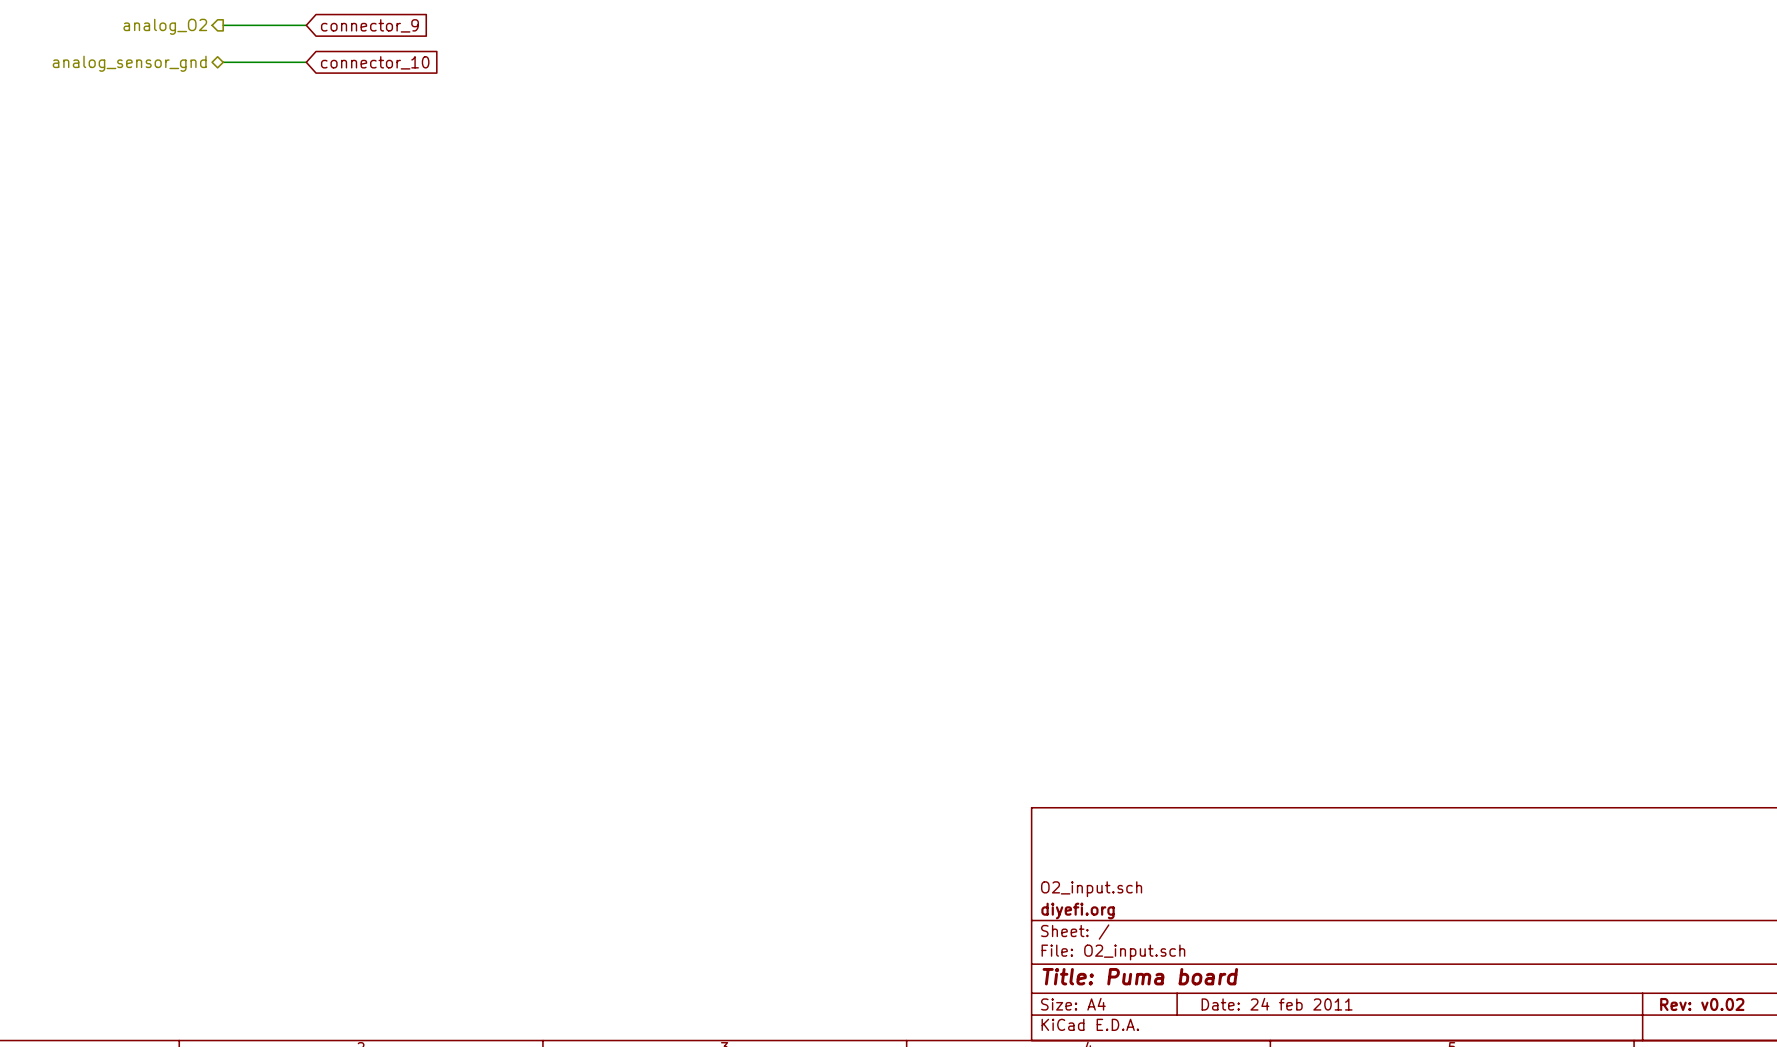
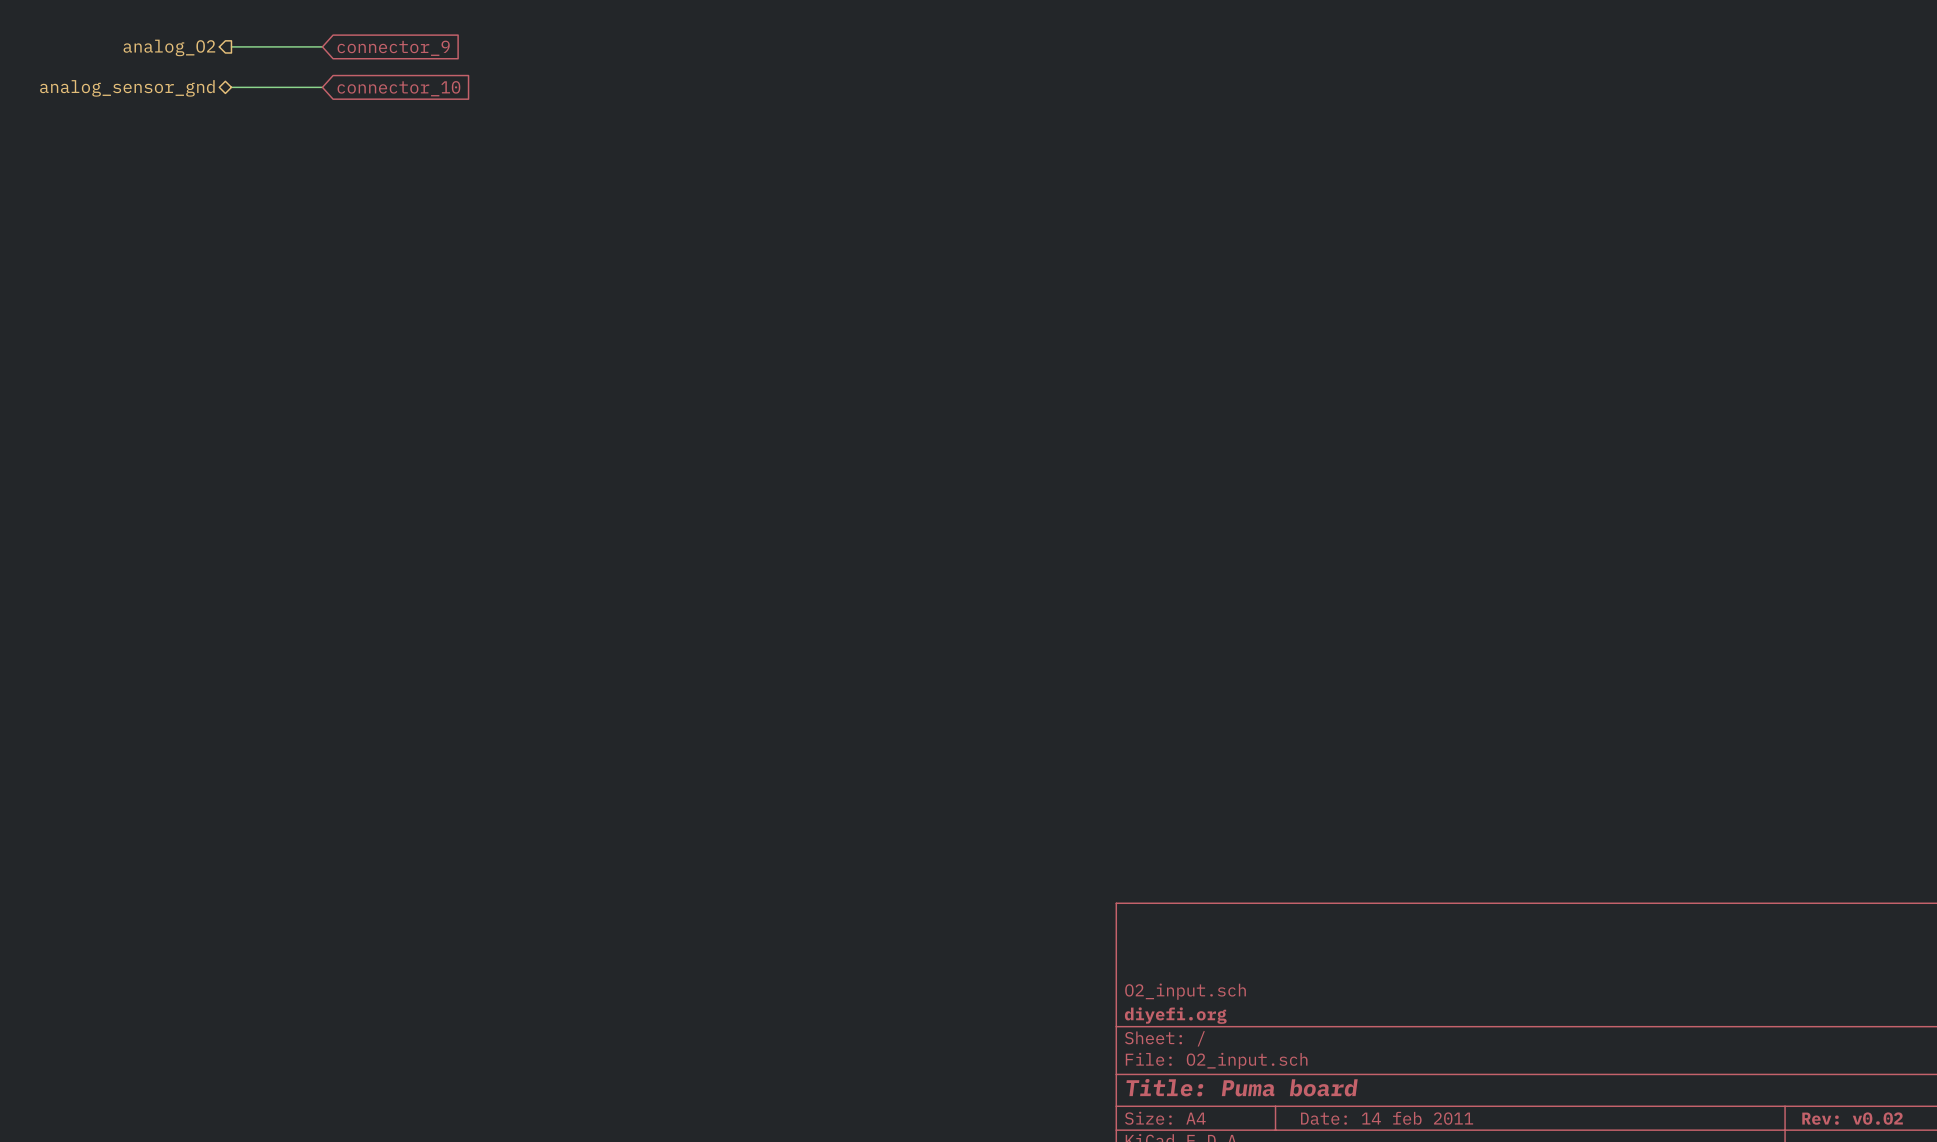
title block: Date: 24 feb 2011 (1277, 1004) -> Date: 14 feb 2011 (1387, 1118)

